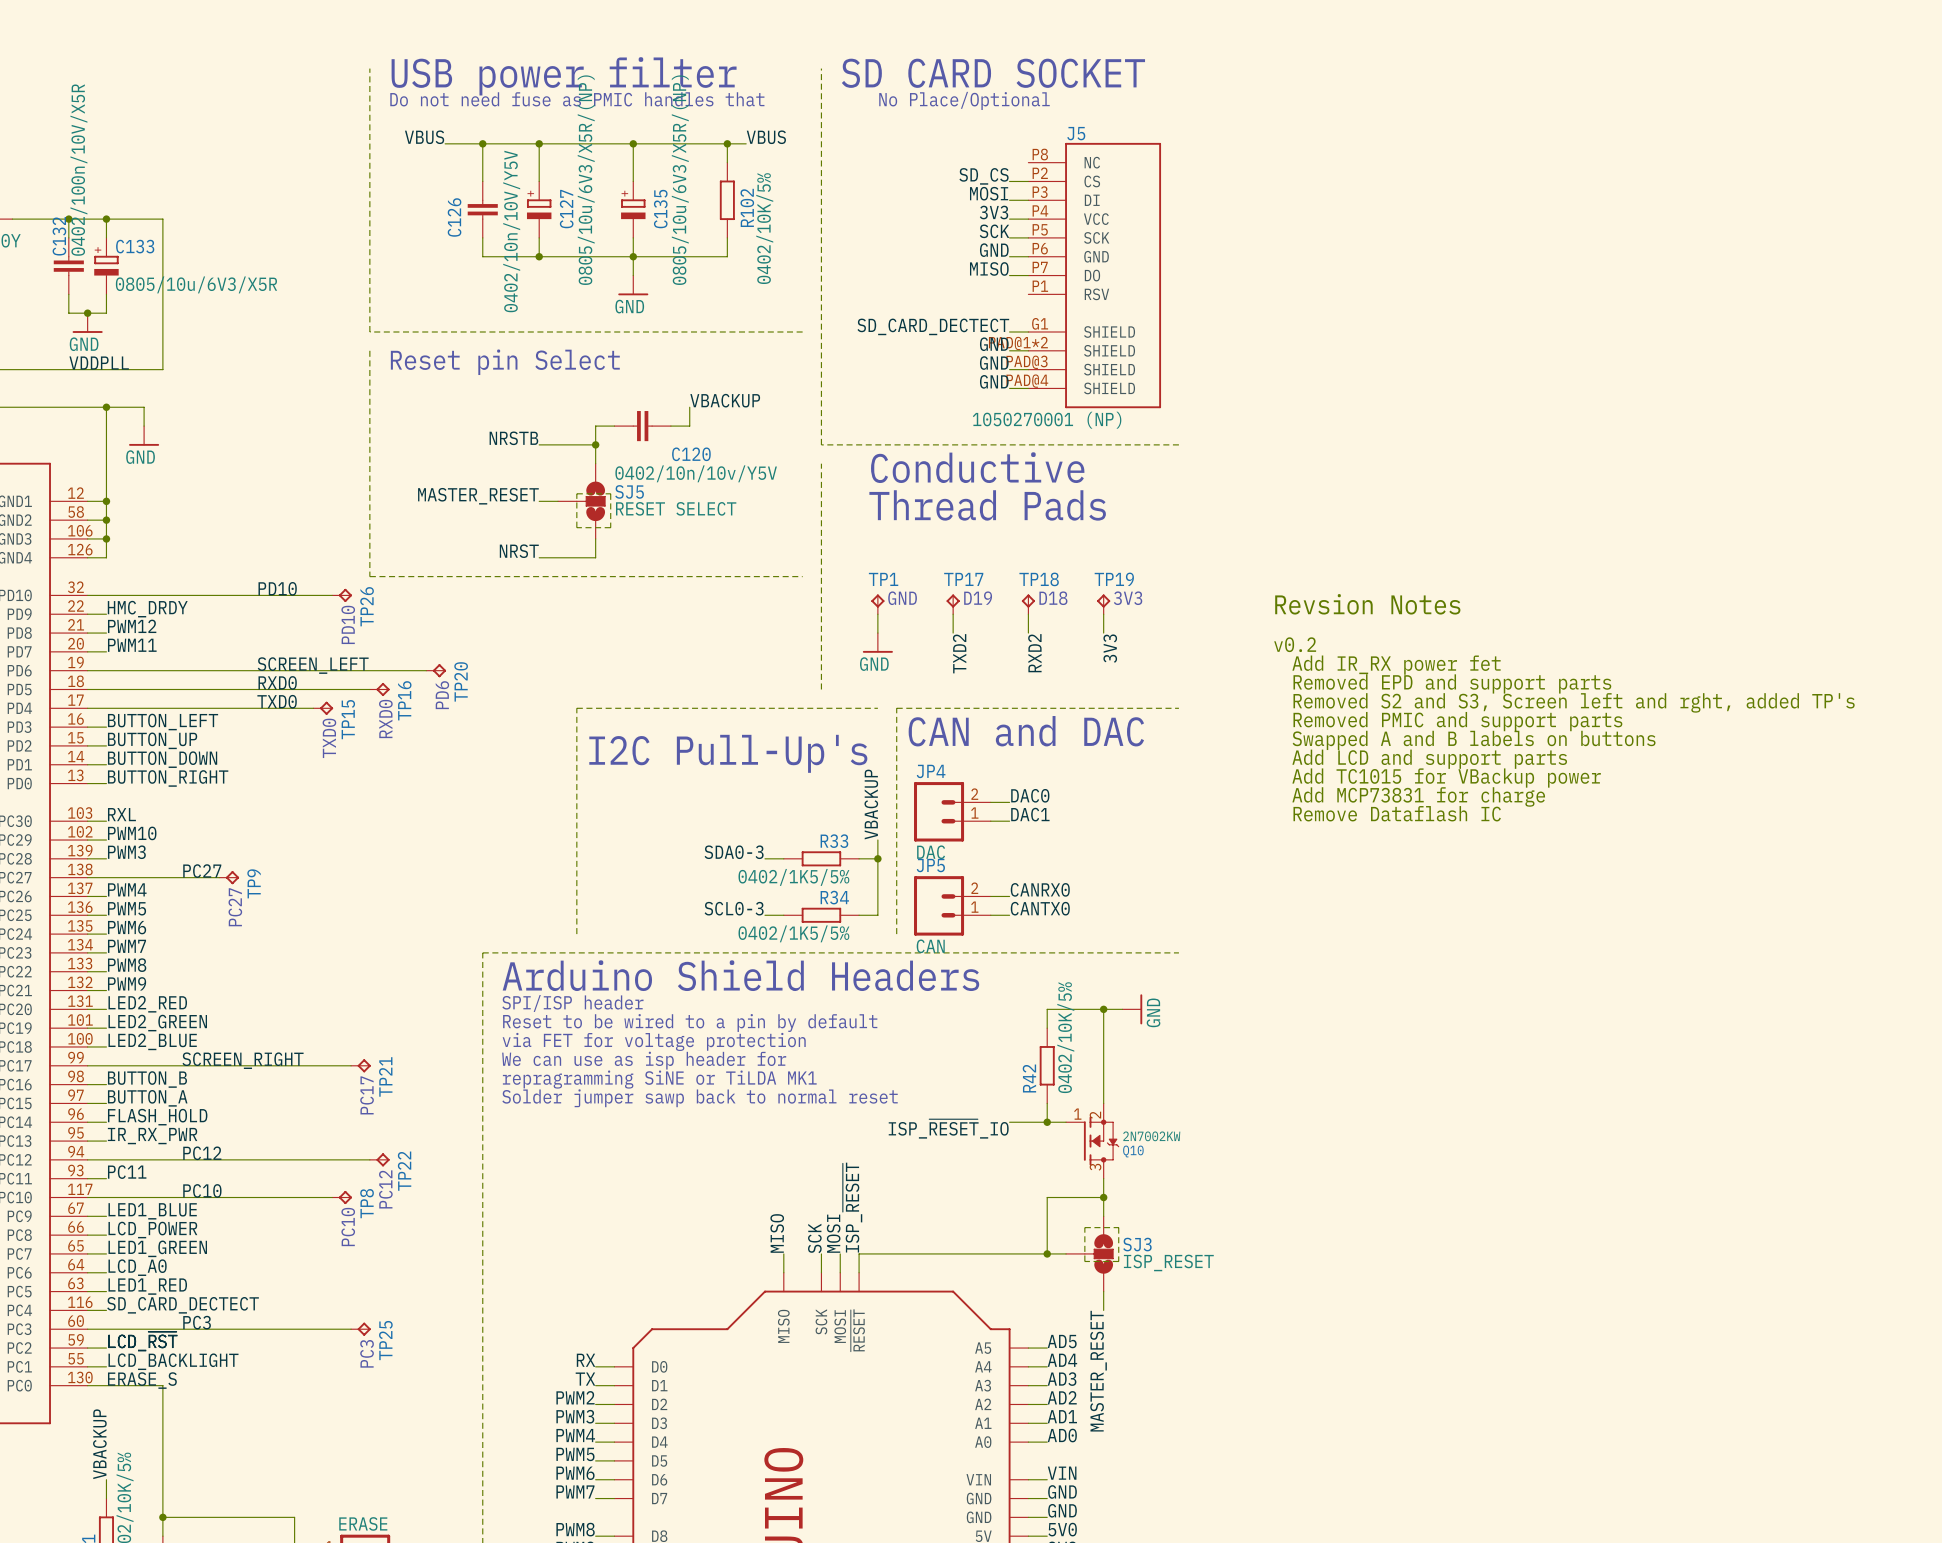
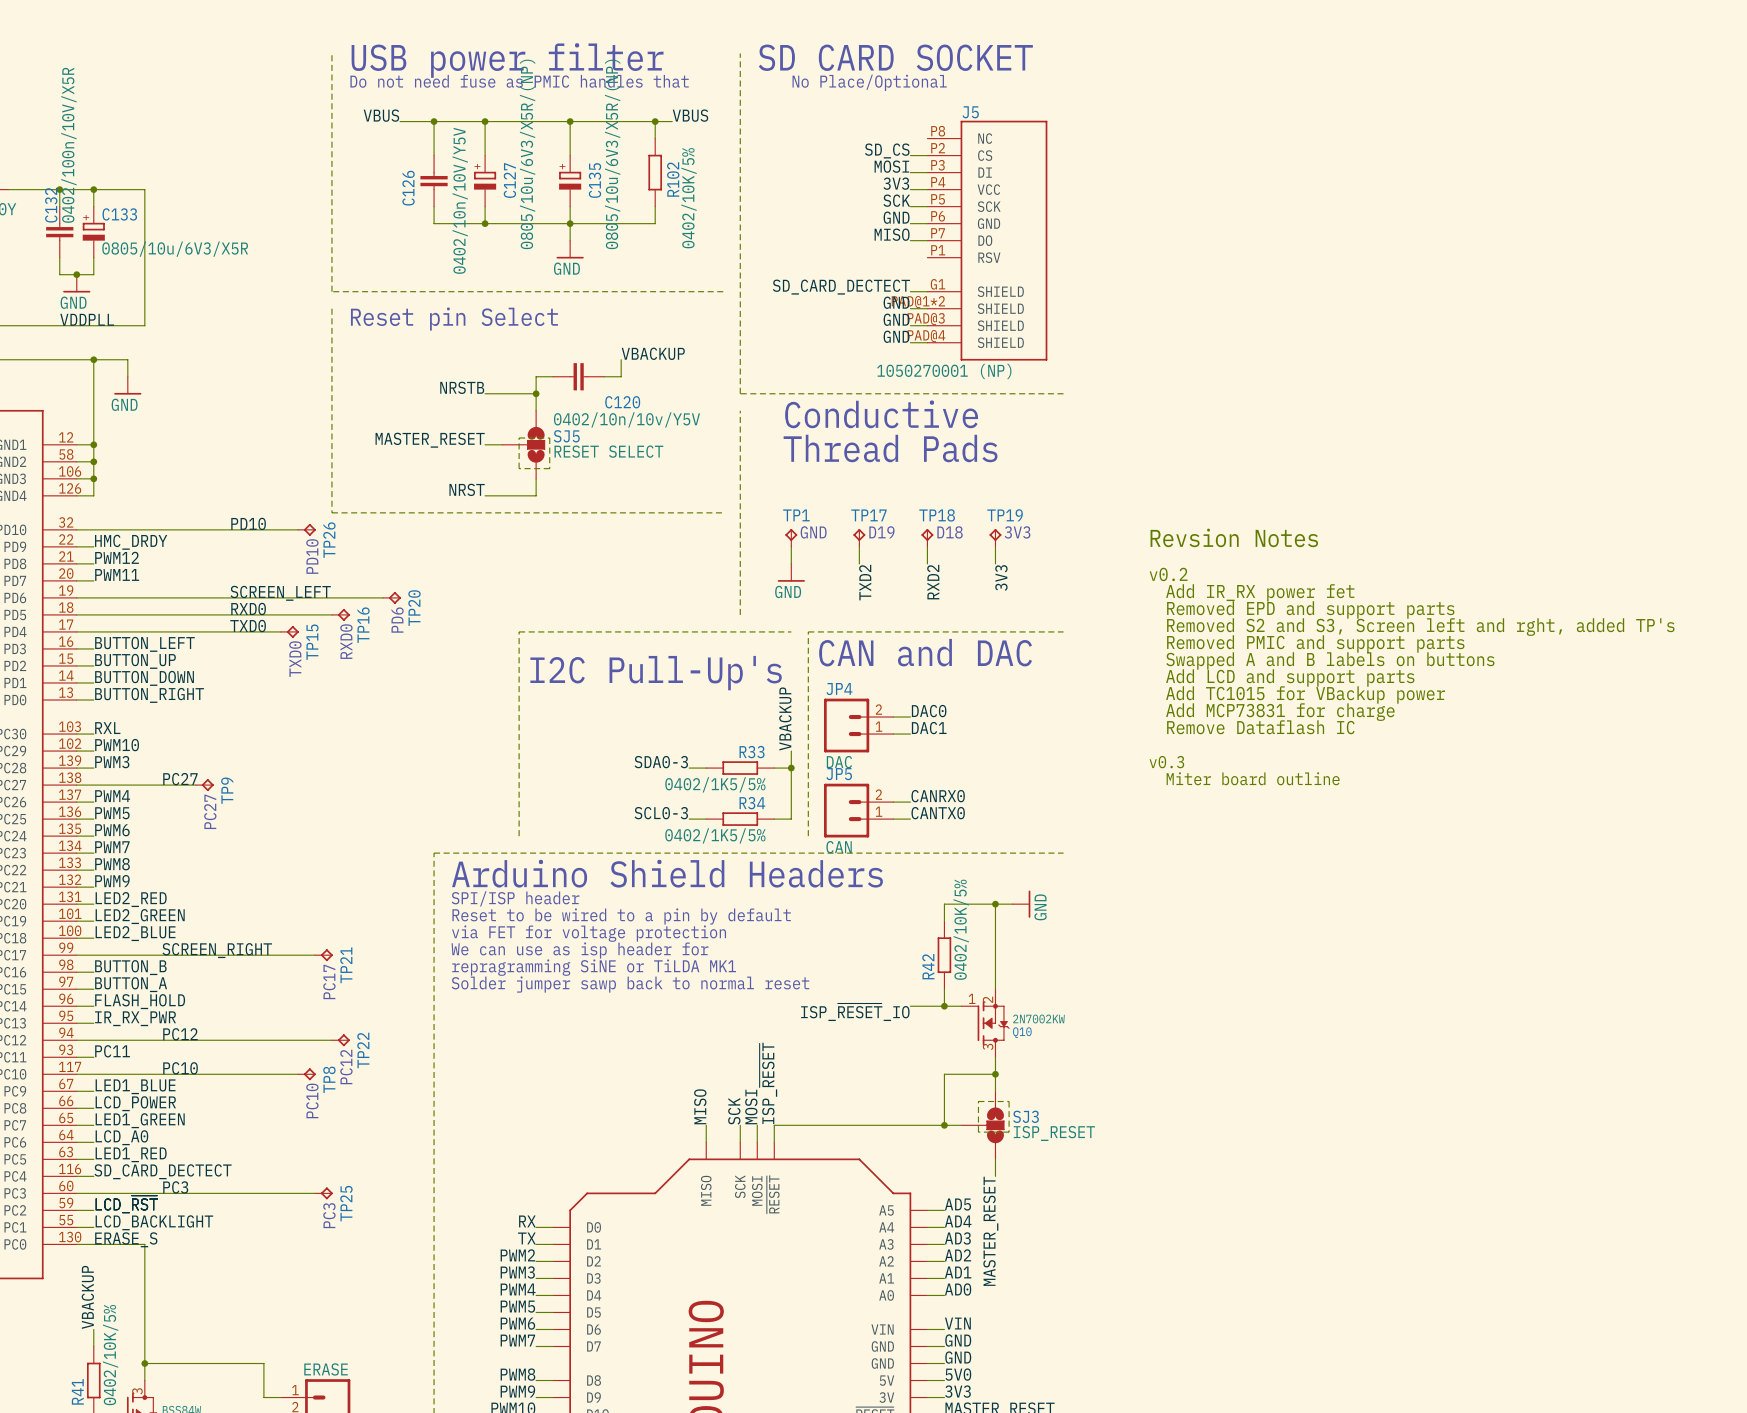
text: none -> v0.3 (1166, 762)
text: none -> Miter board outline (1253, 778)

